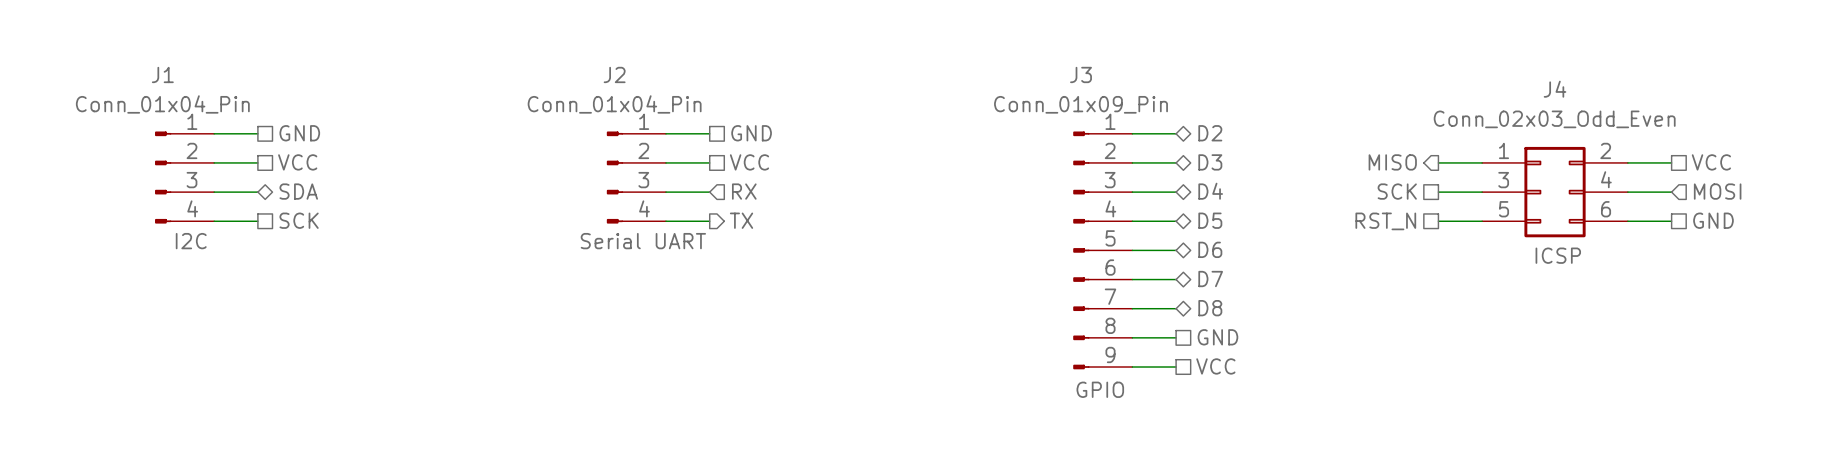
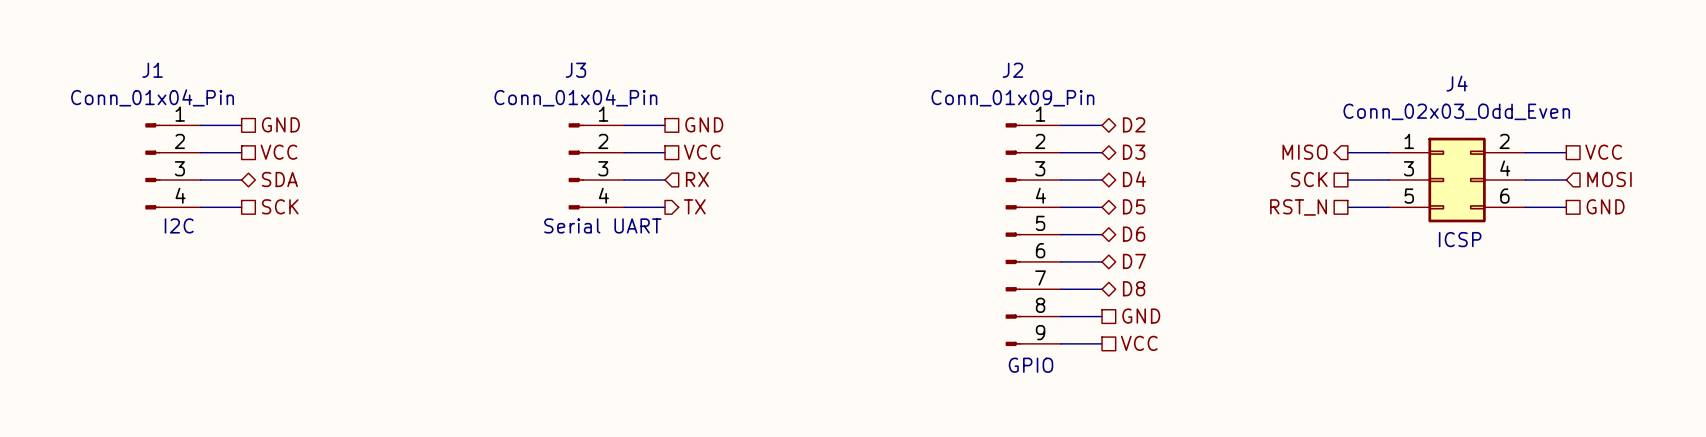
J2 name: J2 (614, 74) -> J3 (575, 70)
J3 name: J3 (1081, 74) -> J2 (1012, 70)

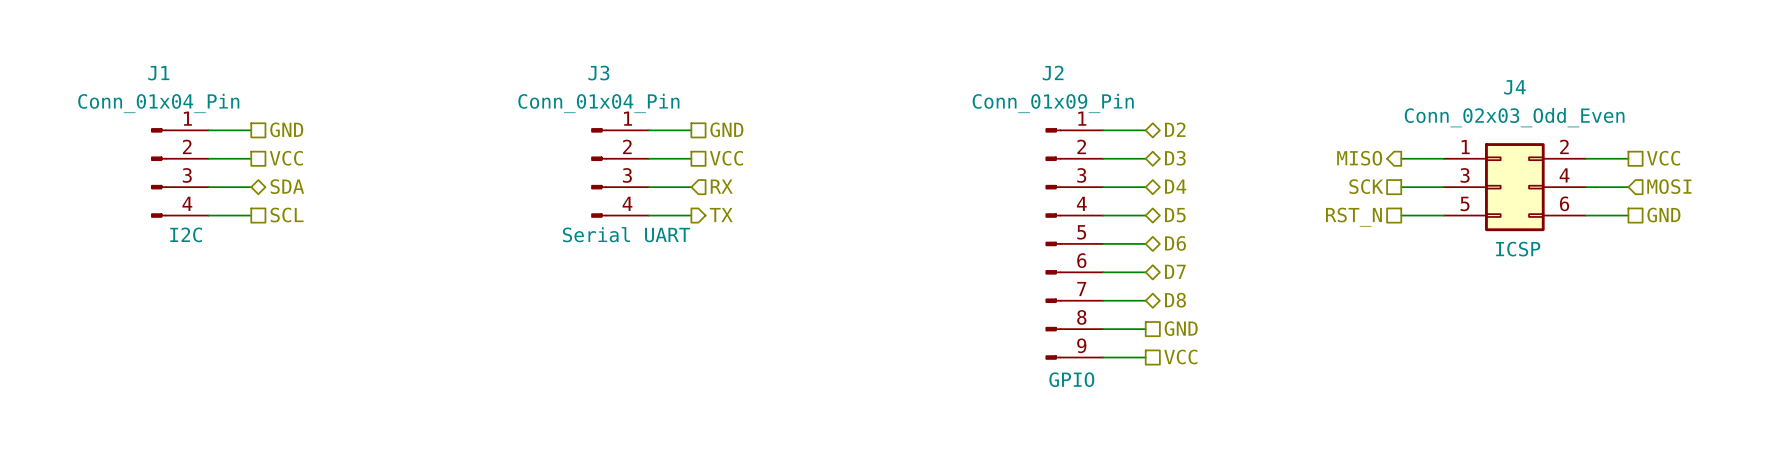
hierarchical label: SCK (280, 206) -> SCL (287, 215)

